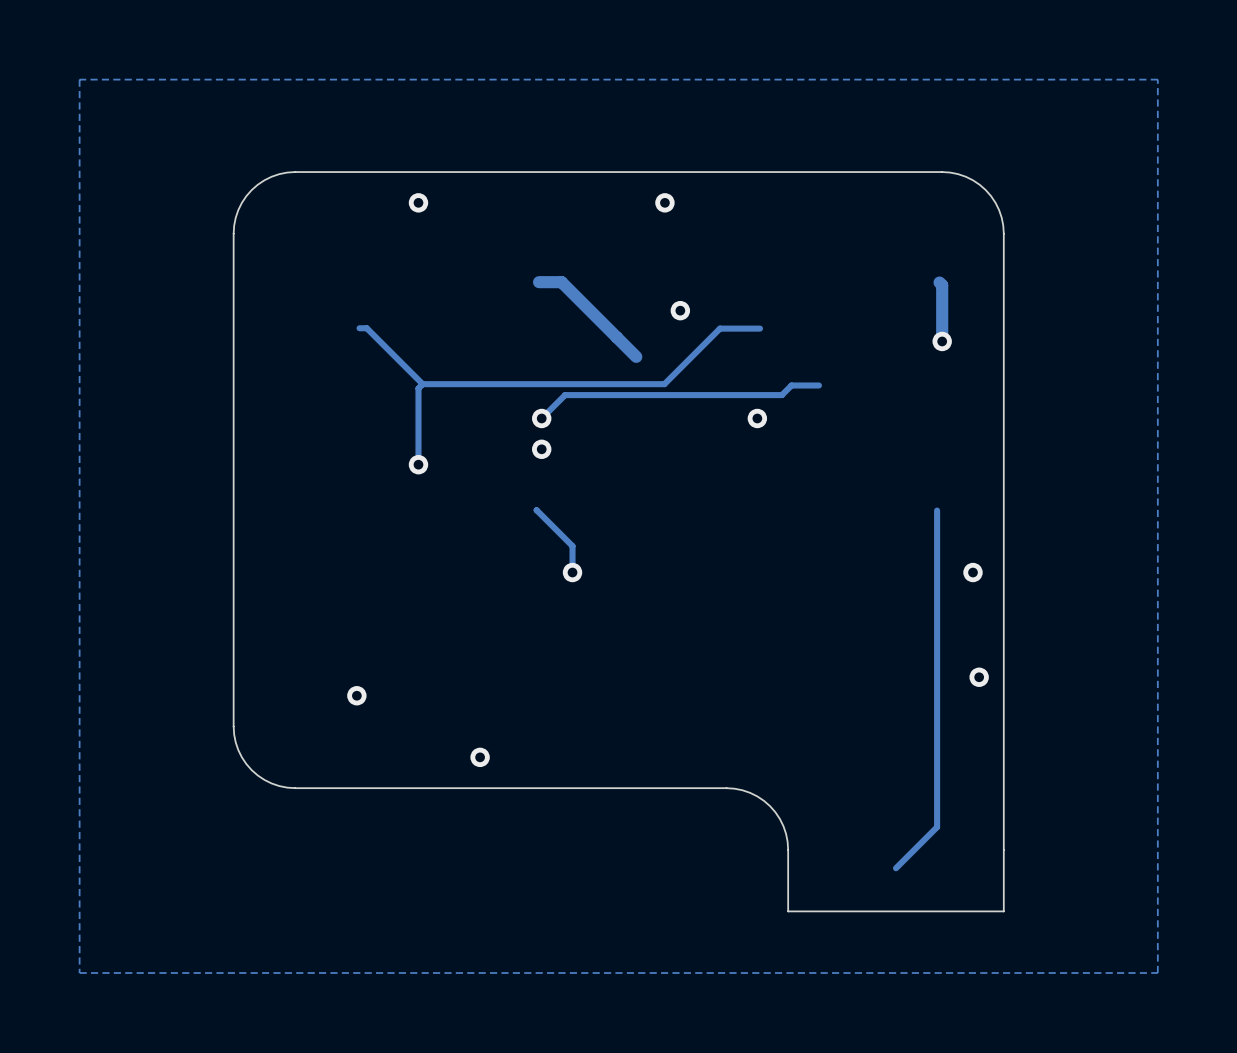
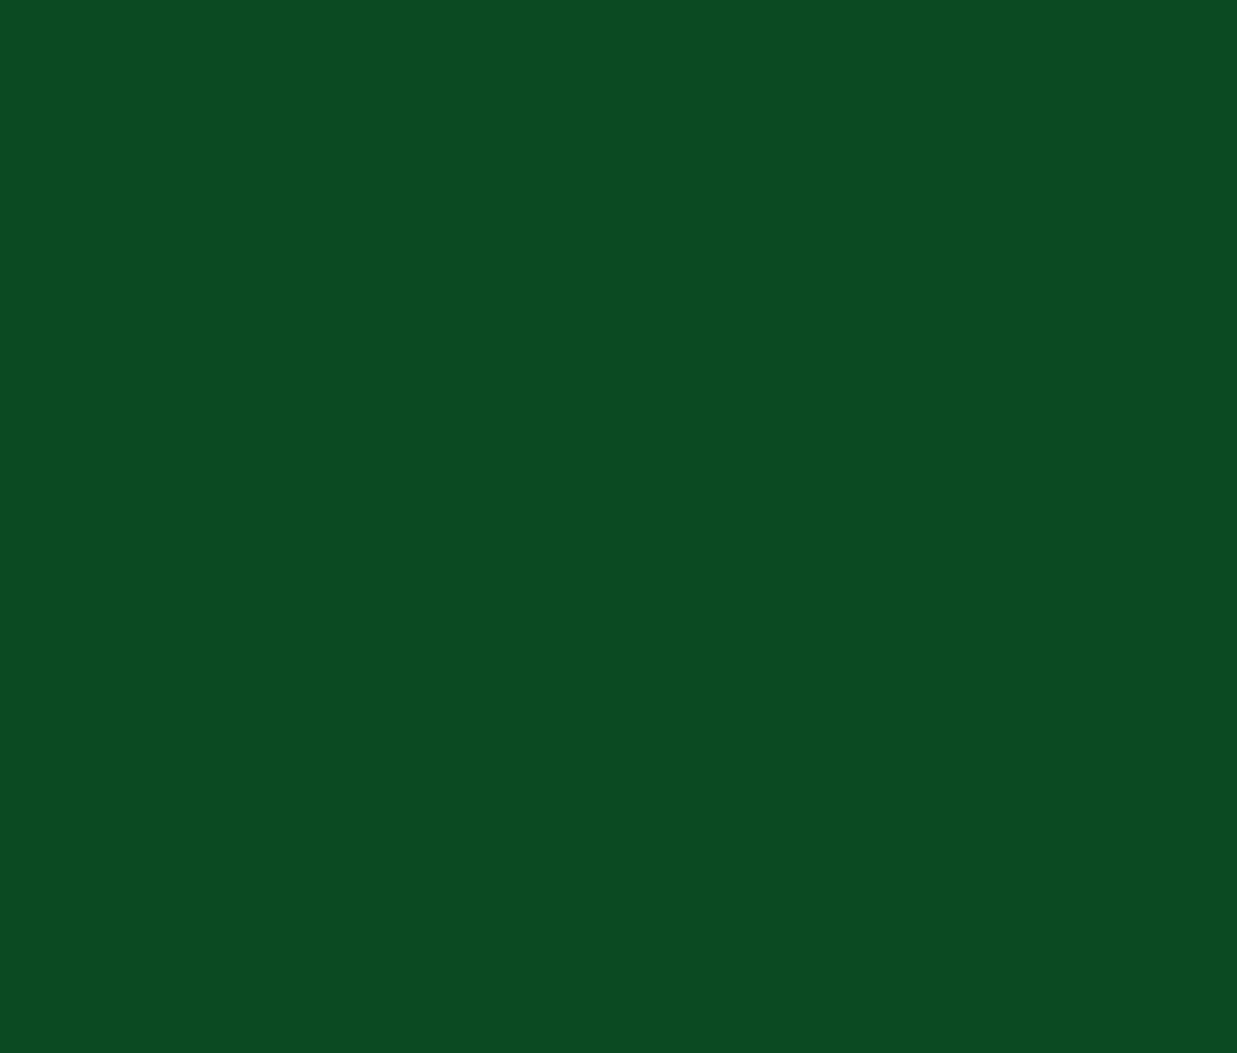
zone outline: (1157, 79) (1157, 973) (79, 973) (79, 79) (1157, 79) -> none
board edge: (942, 172) (295, 172) (271, 176) (257, 184) (246, 196) (238, 210) (233, 233) (233, 726) (235, 742) (246, 764) (257, 775) (271, 783) (295, 788) (734, 788) (750, 792) (764, 800) (775, 812) (783, 826) (788, 849) (788, 911) (1003, 911) (1003, 225) (995, 202) (985, 190) (965, 176) (942, 172) -> none
via: (418, 202) -> none
via: (664, 202) -> none
track: (539, 282) (561, 282) (636, 356) -> none
track: (939, 282) (942, 285) (942, 341) -> none
via: (680, 310) -> none
track: (359, 328) (366, 328) (422, 384) -> none
track: (760, 328) (720, 328) (664, 384) (422, 384) -> none
via: (942, 341) -> none
track: (422, 384) (418, 388) (418, 464) -> none
track: (818, 385) (791, 385) (781, 395) (565, 395) (541, 418) -> none
via: (541, 418) -> none
via: (757, 418) -> none
via: (541, 449) -> none
via: (418, 464) -> none
track: (536, 510) (572, 546) (572, 572) -> none
track: (937, 510) (937, 827) (895, 868) -> none
via: (572, 572) -> none
via: (973, 572) -> none
via: (979, 677) -> none
via: (356, 695) -> none
via: (480, 757) -> none

